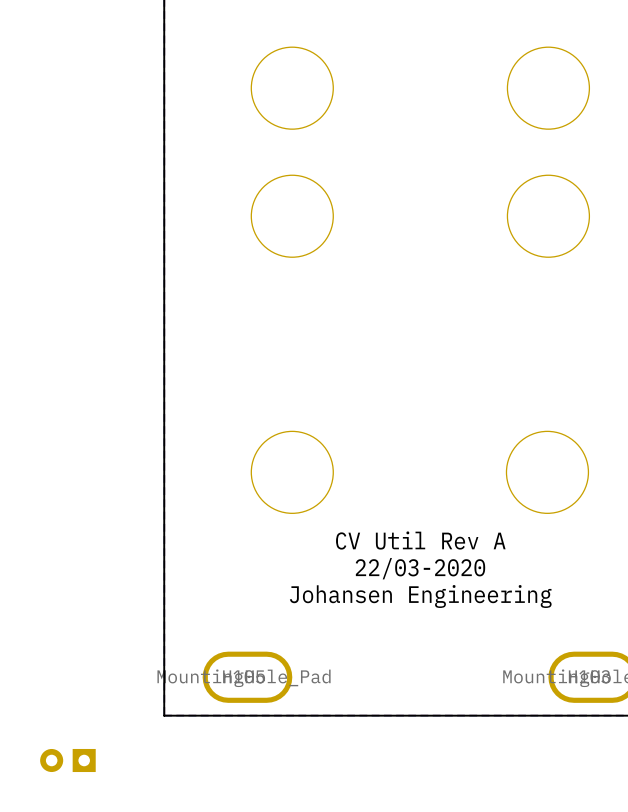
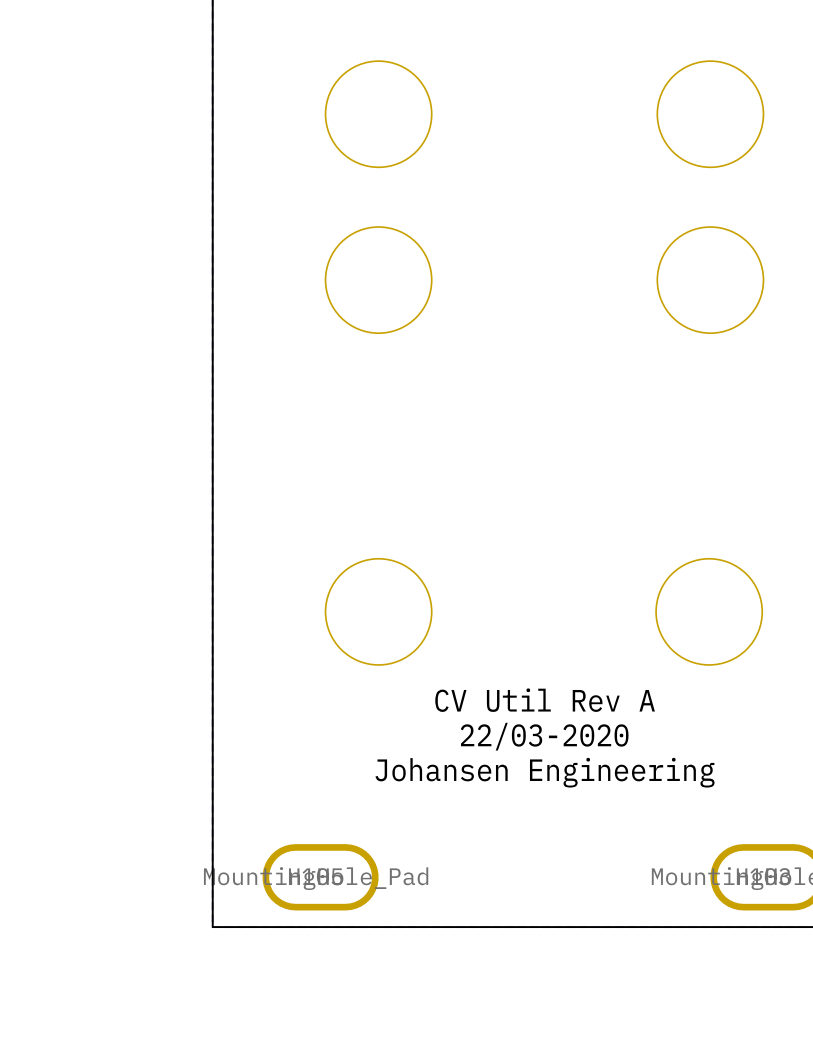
part: (67, 760) -> none

